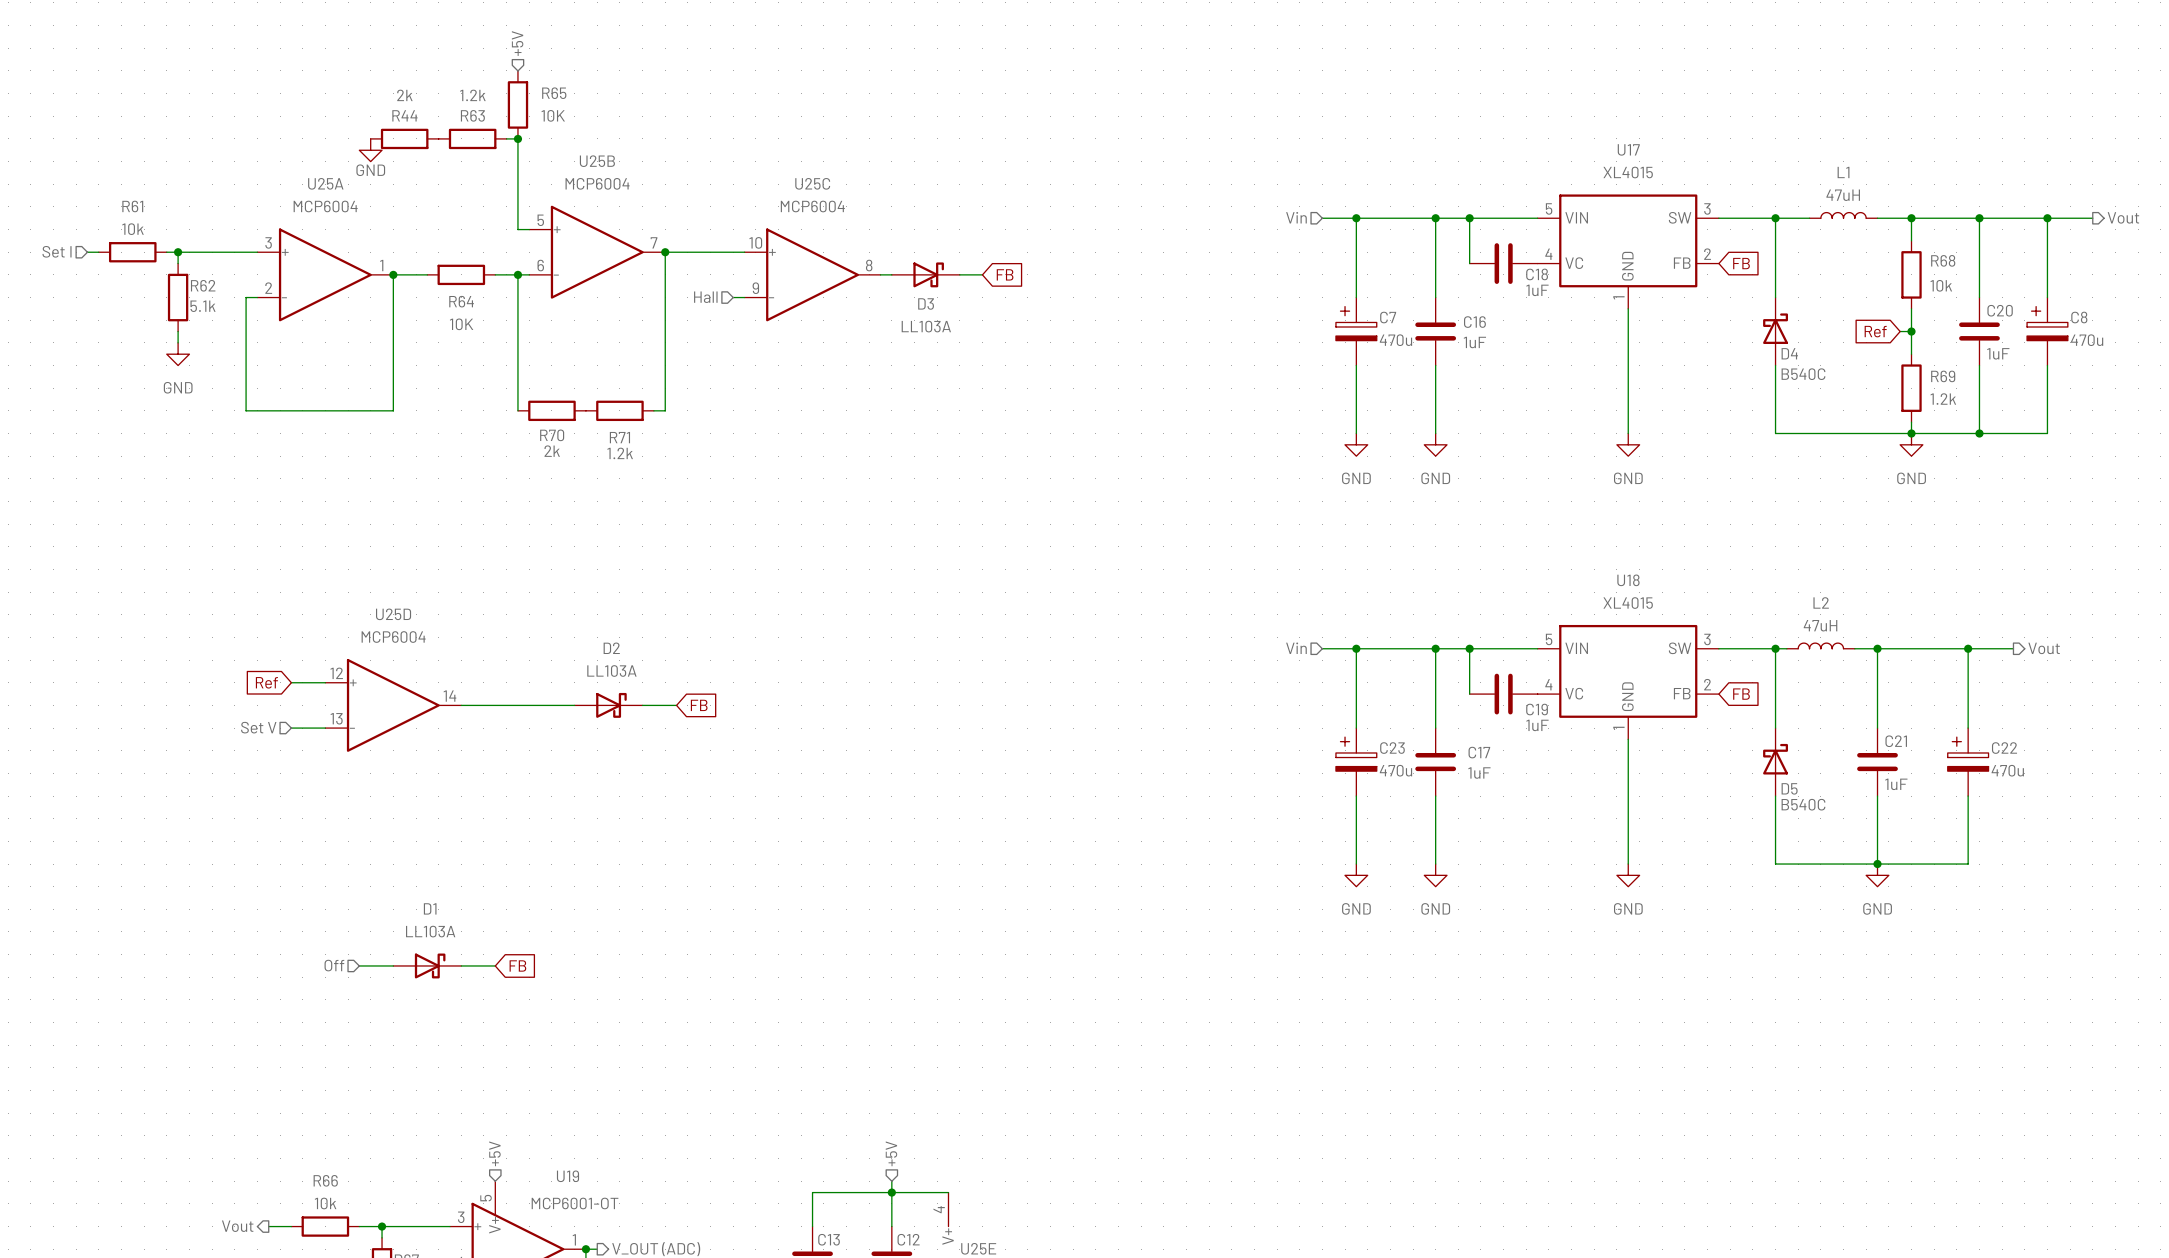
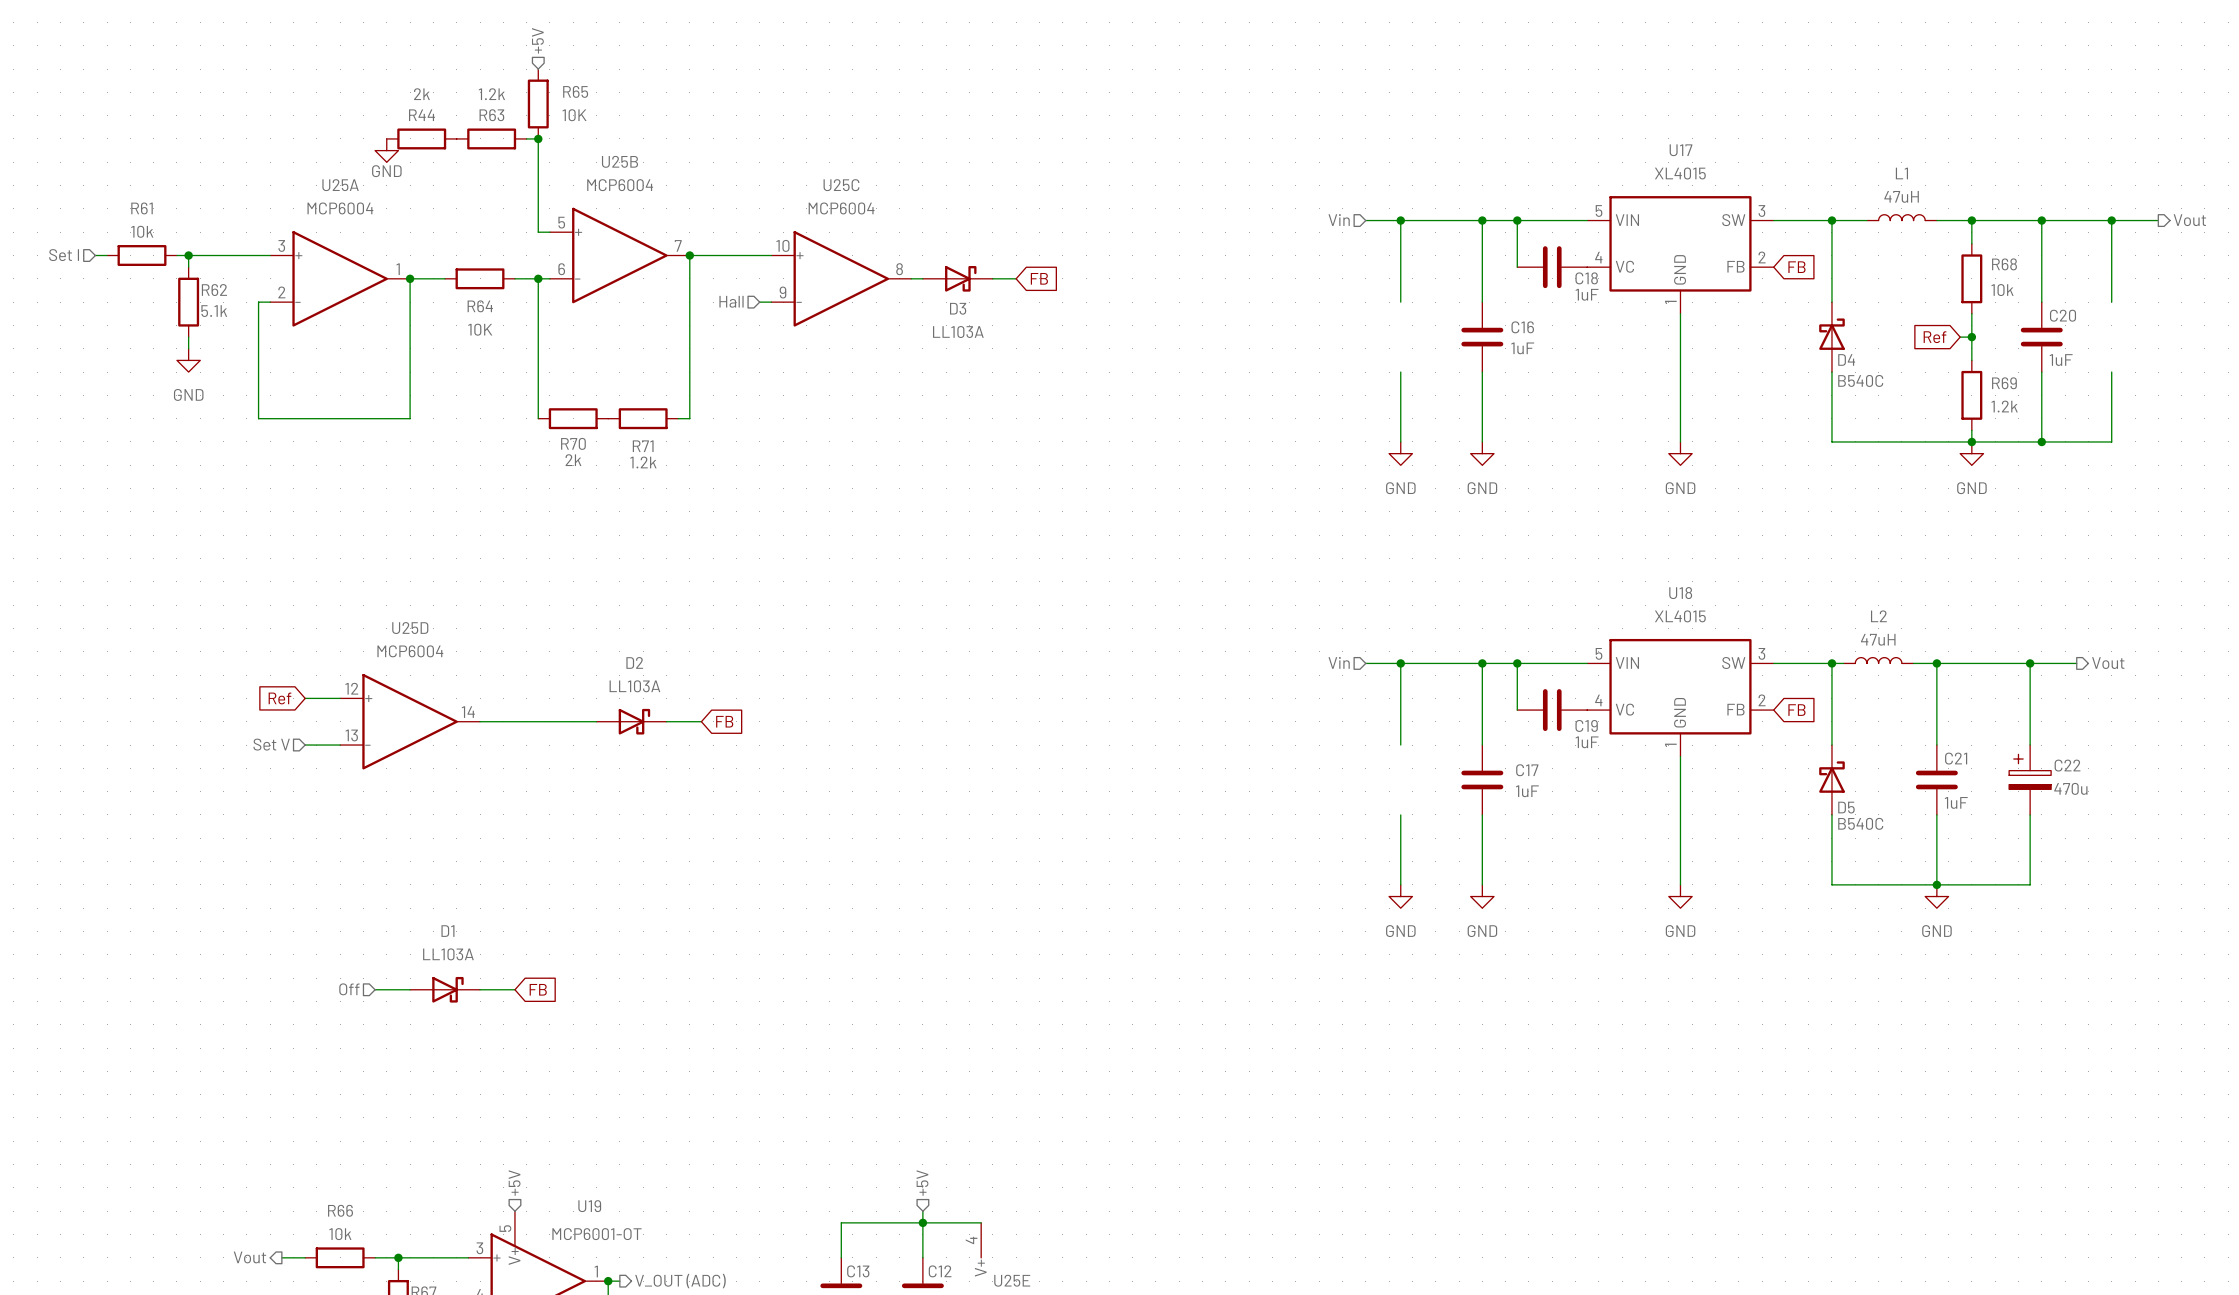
C7: 470u (1356, 331) -> none
C8: 470u (2047, 331) -> none
C23: 470u (1356, 762) -> none

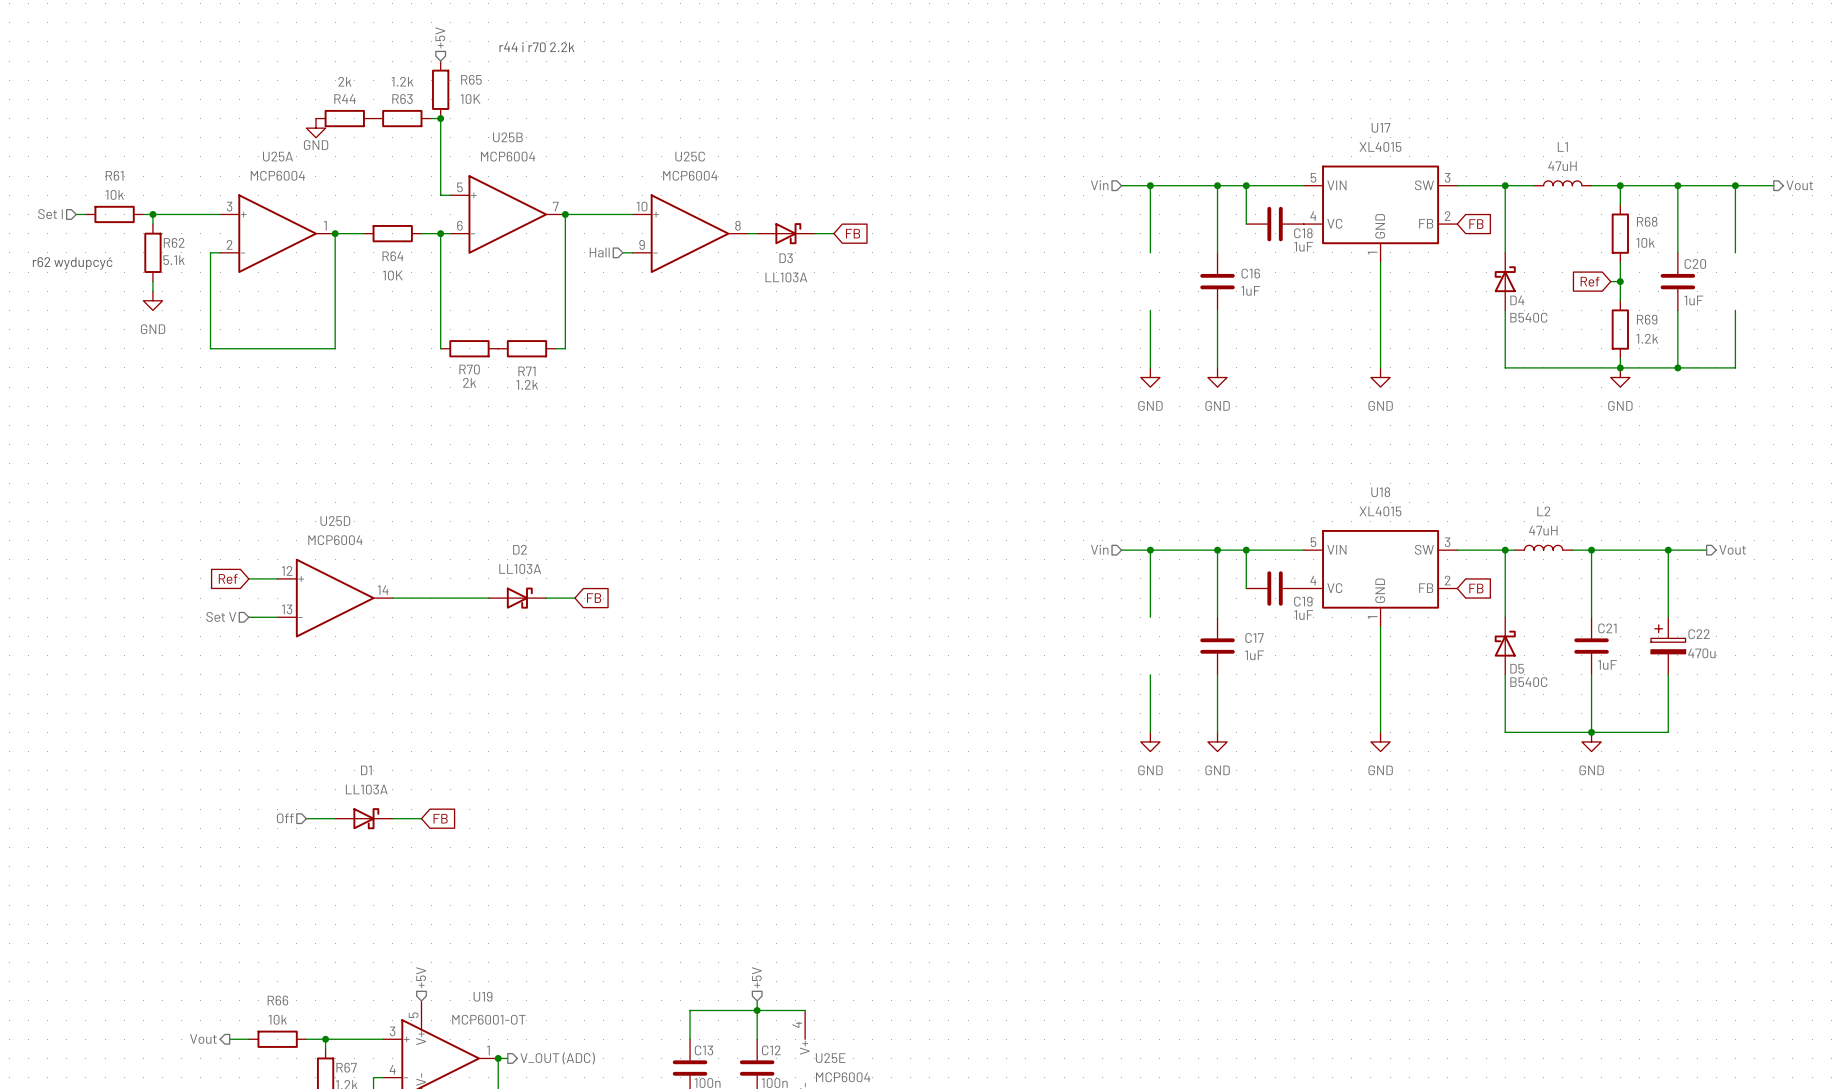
text: none -> r44 i r70 2.2k (536, 47)
text: none -> r62 wydupcyć (72, 263)

